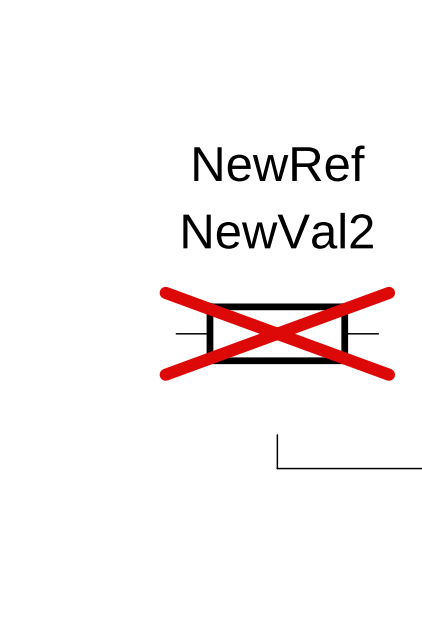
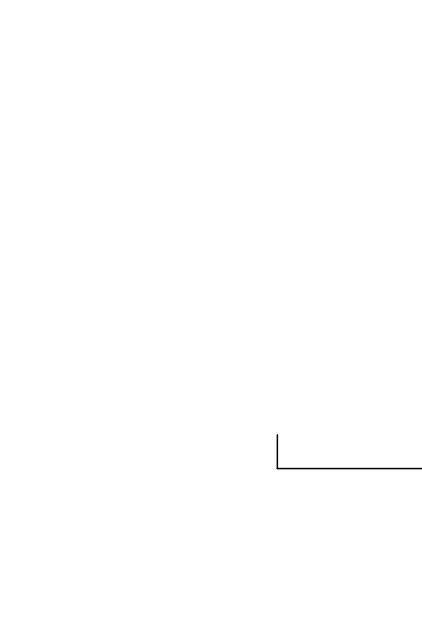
NewRef: NewVal2 (277, 333) -> none

